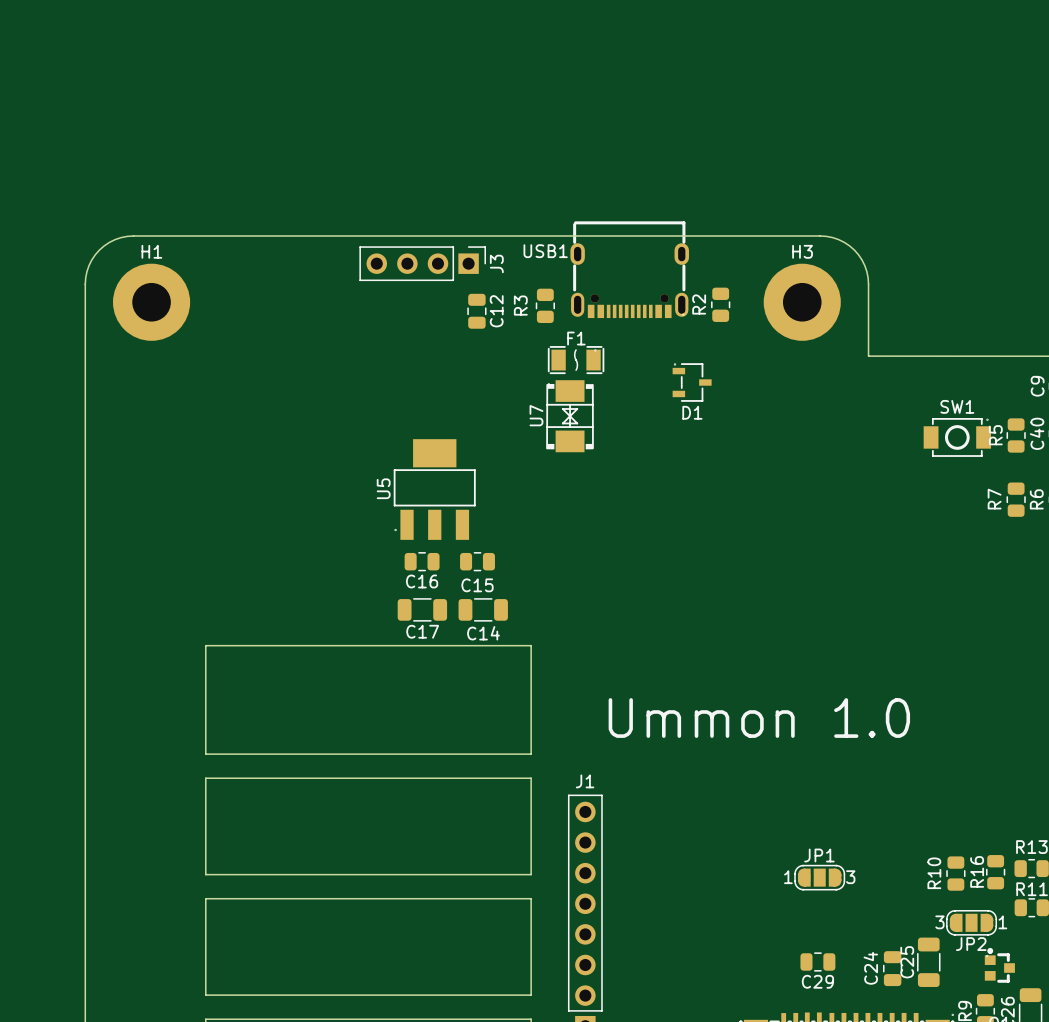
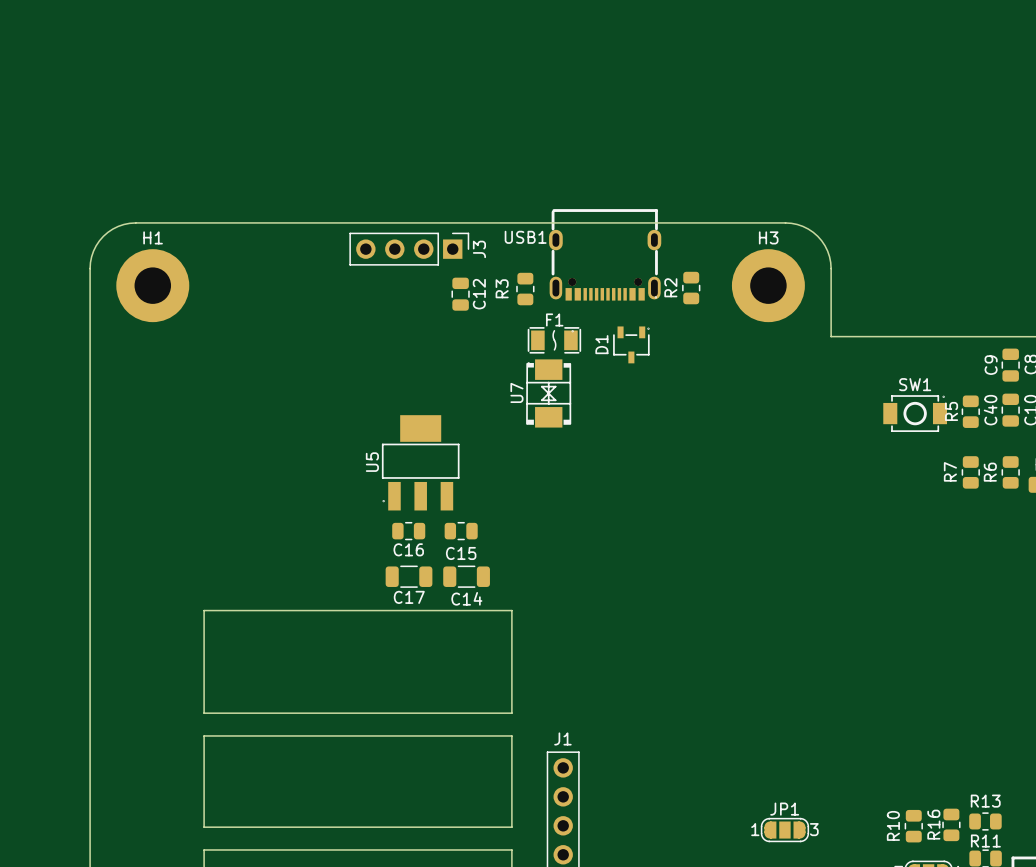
D1 rotation: 0° (692, 382) -> 90° clockwise (631, 344)
D1 position: (692, 382) -> (631, 344)
text: Ummon 1.0 (759, 718) -> none

